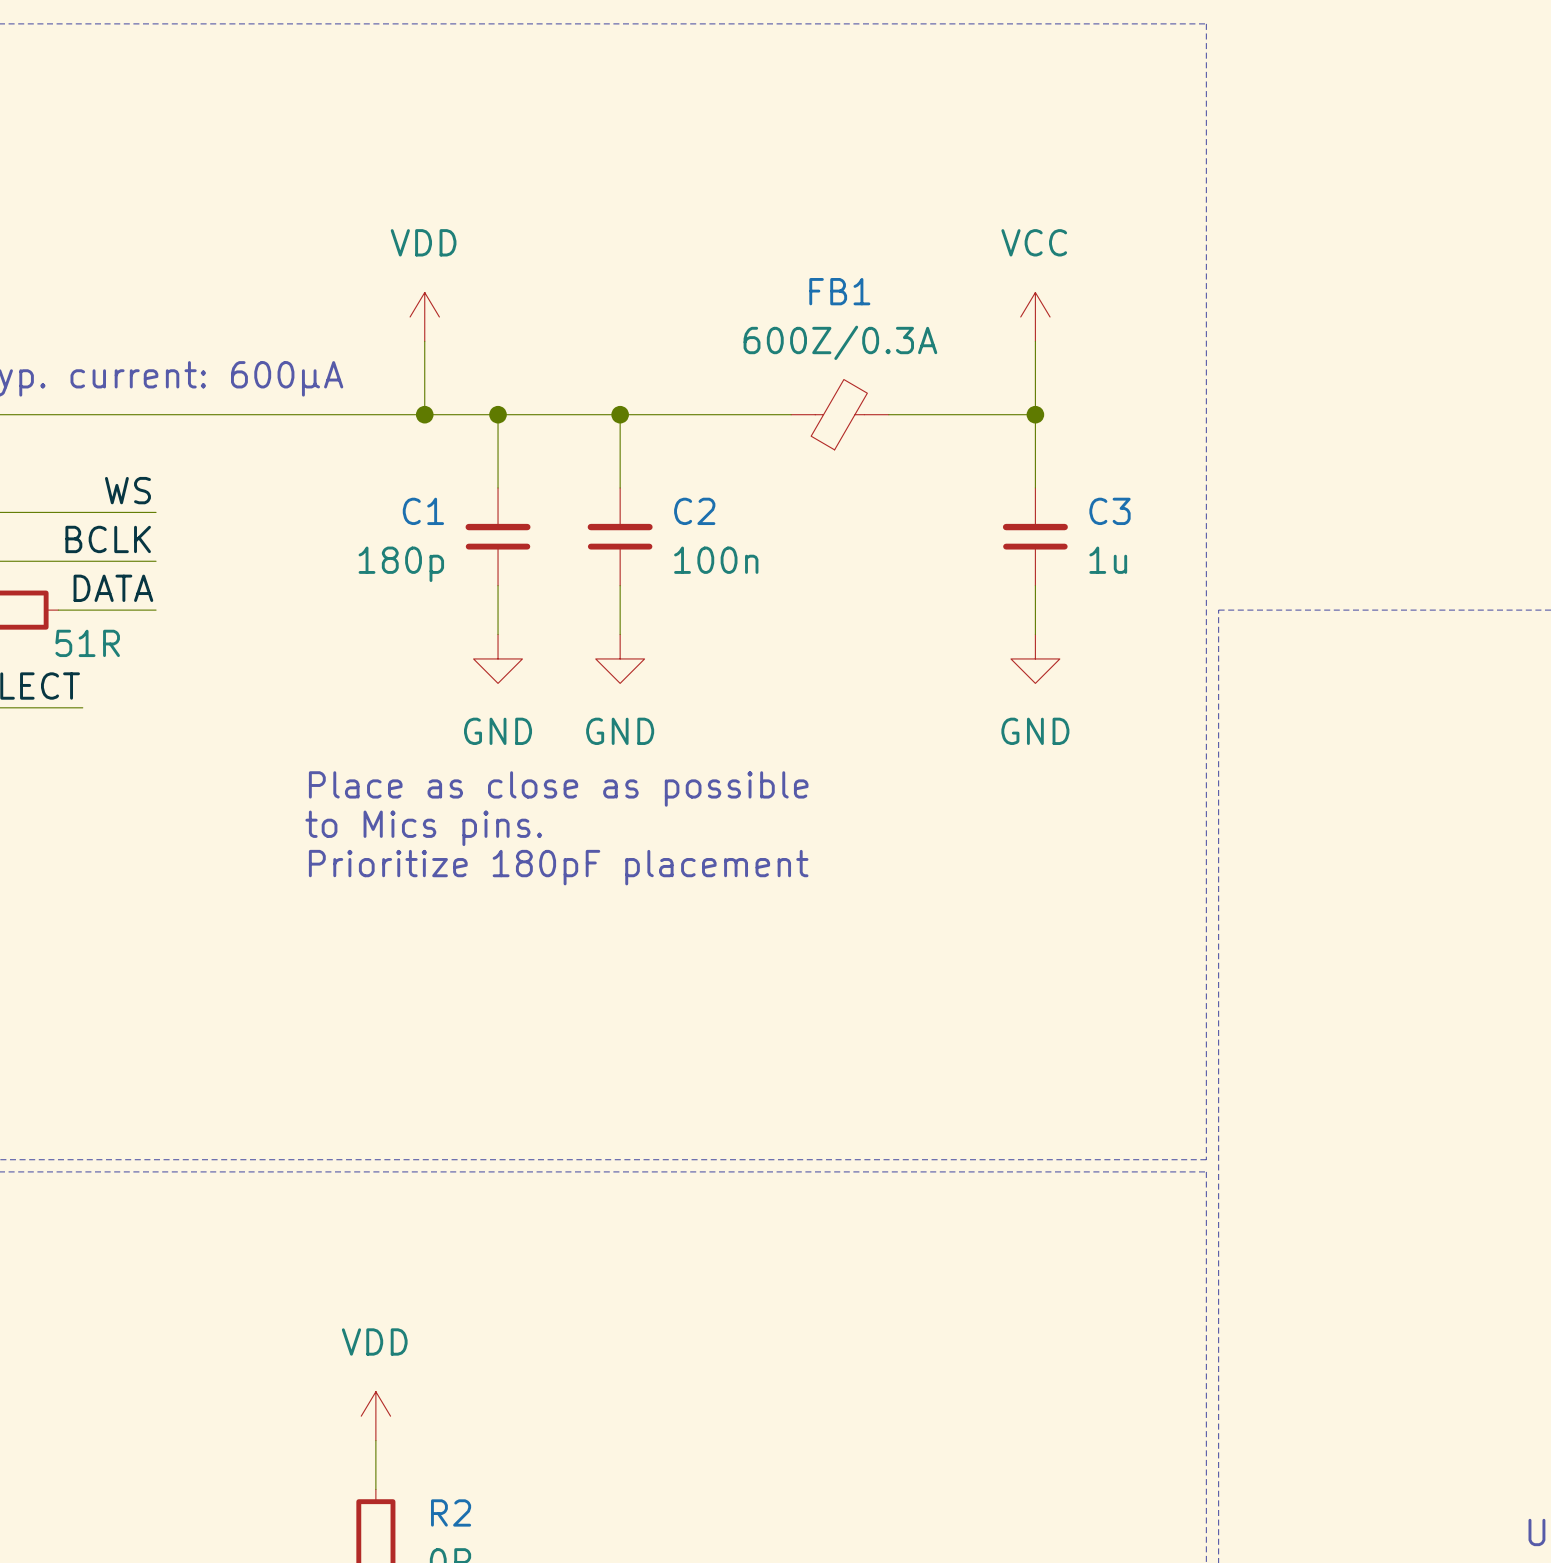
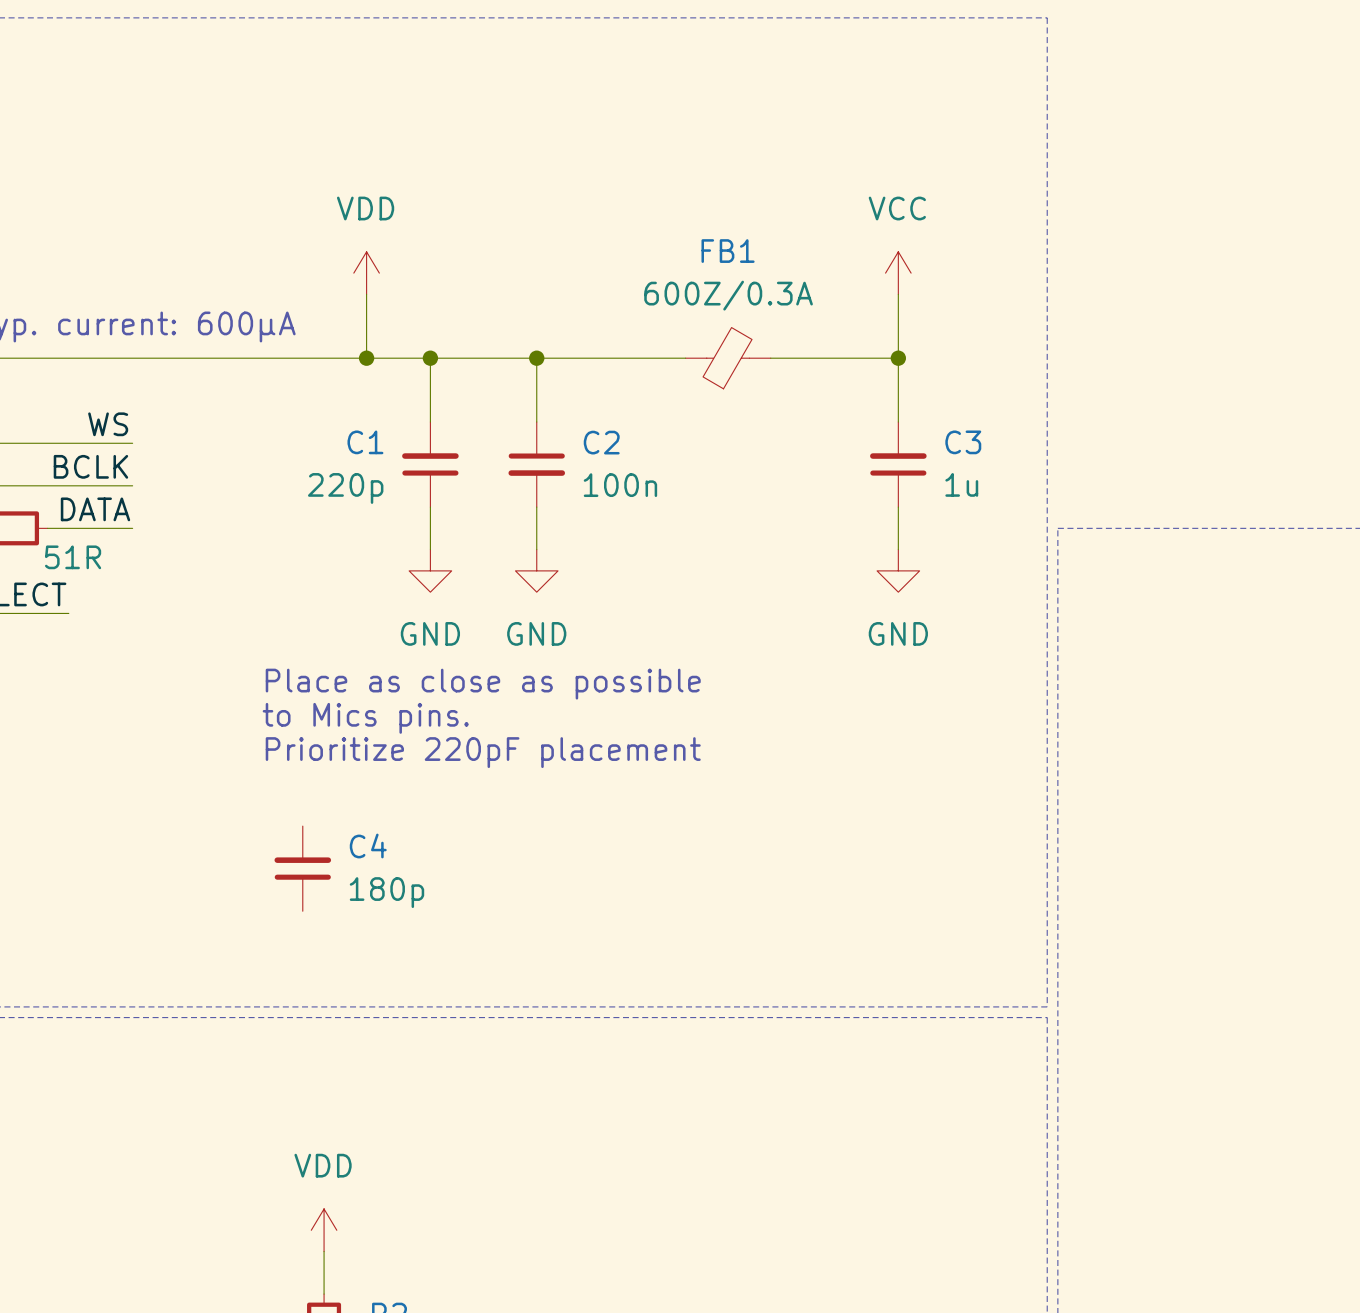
C2 rotation: 0° (620, 536) -> 180° (536, 464)
C1 text: 180p (401, 564) -> 220p (345, 488)
text: Prioritize 180pF placement (558, 867) -> Prioritize 220pF placement (483, 752)
C4: none -> (302, 868)

